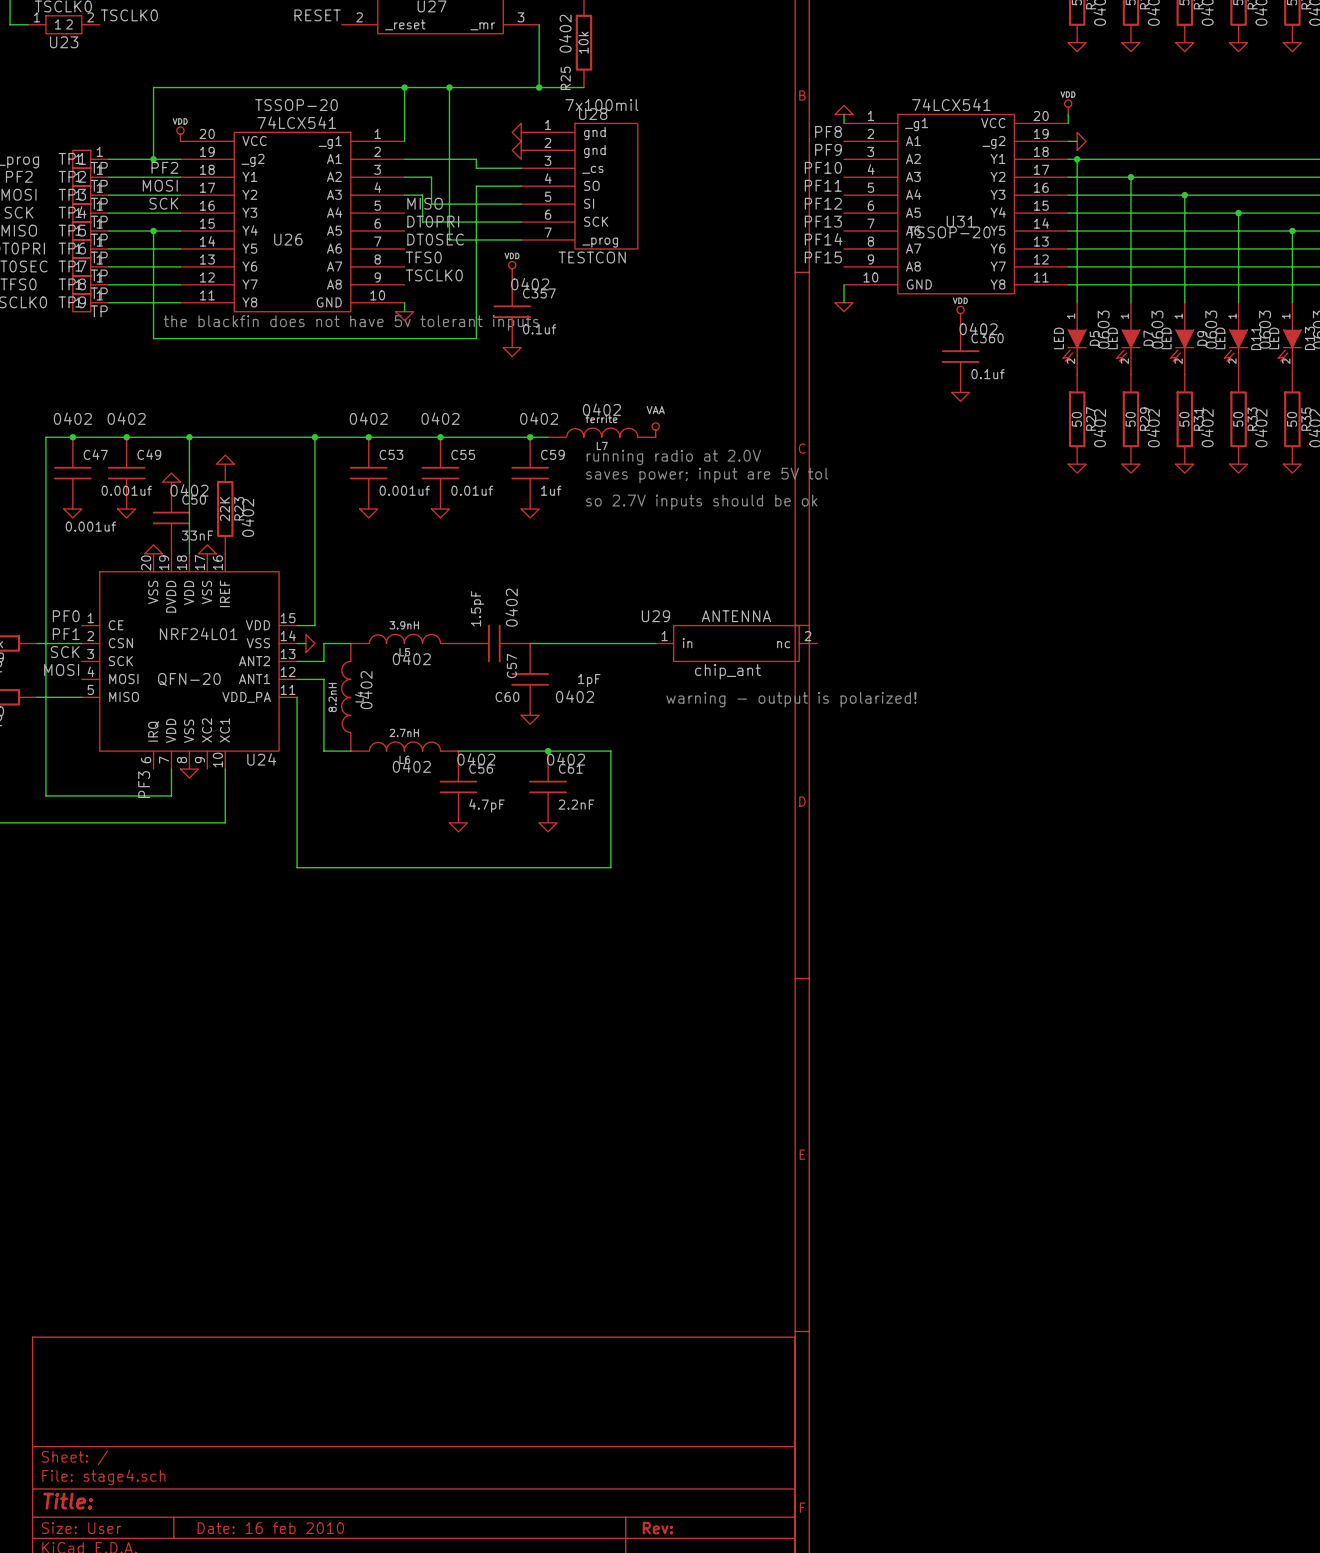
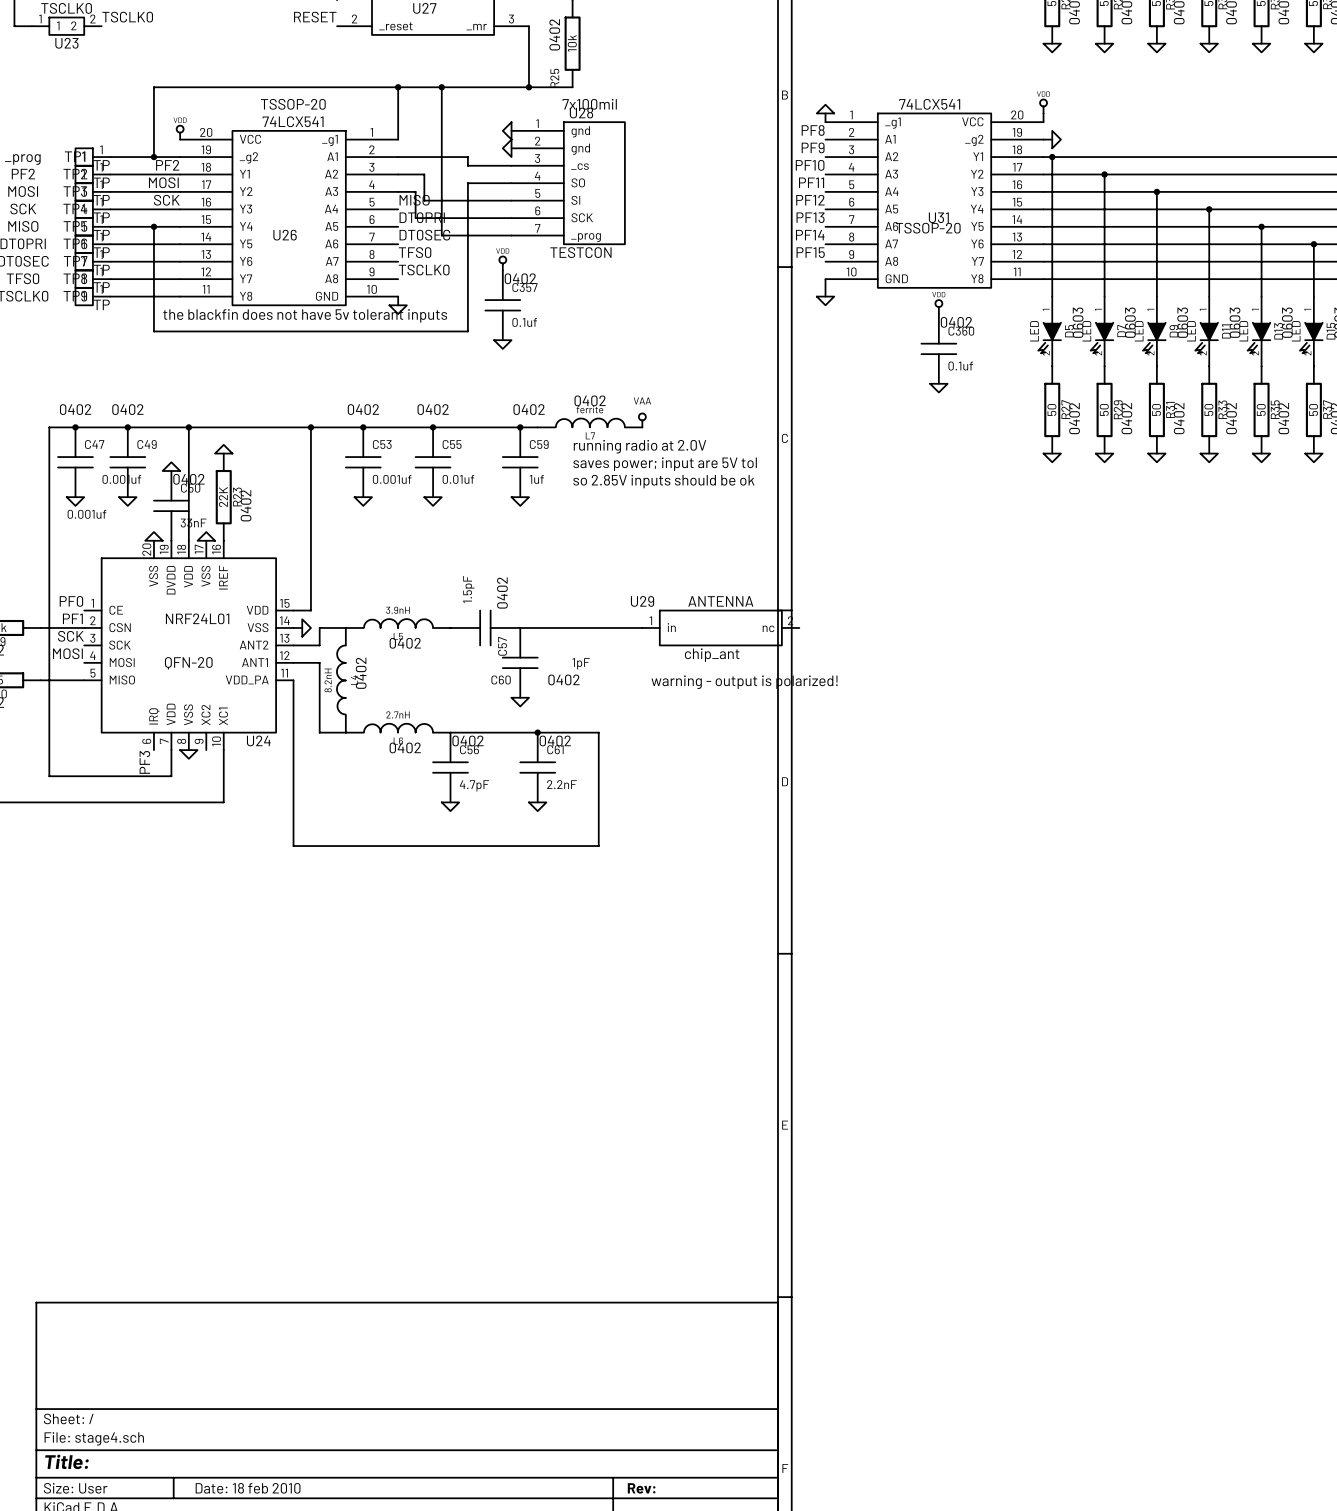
text: so 2.7V inputs should be ok (701, 502) -> so 2.85V inputs should be ok (663, 481)
title block: Date: 16 feb 2010 (270, 1528) -> Date: 18 feb 2010 (248, 1488)

